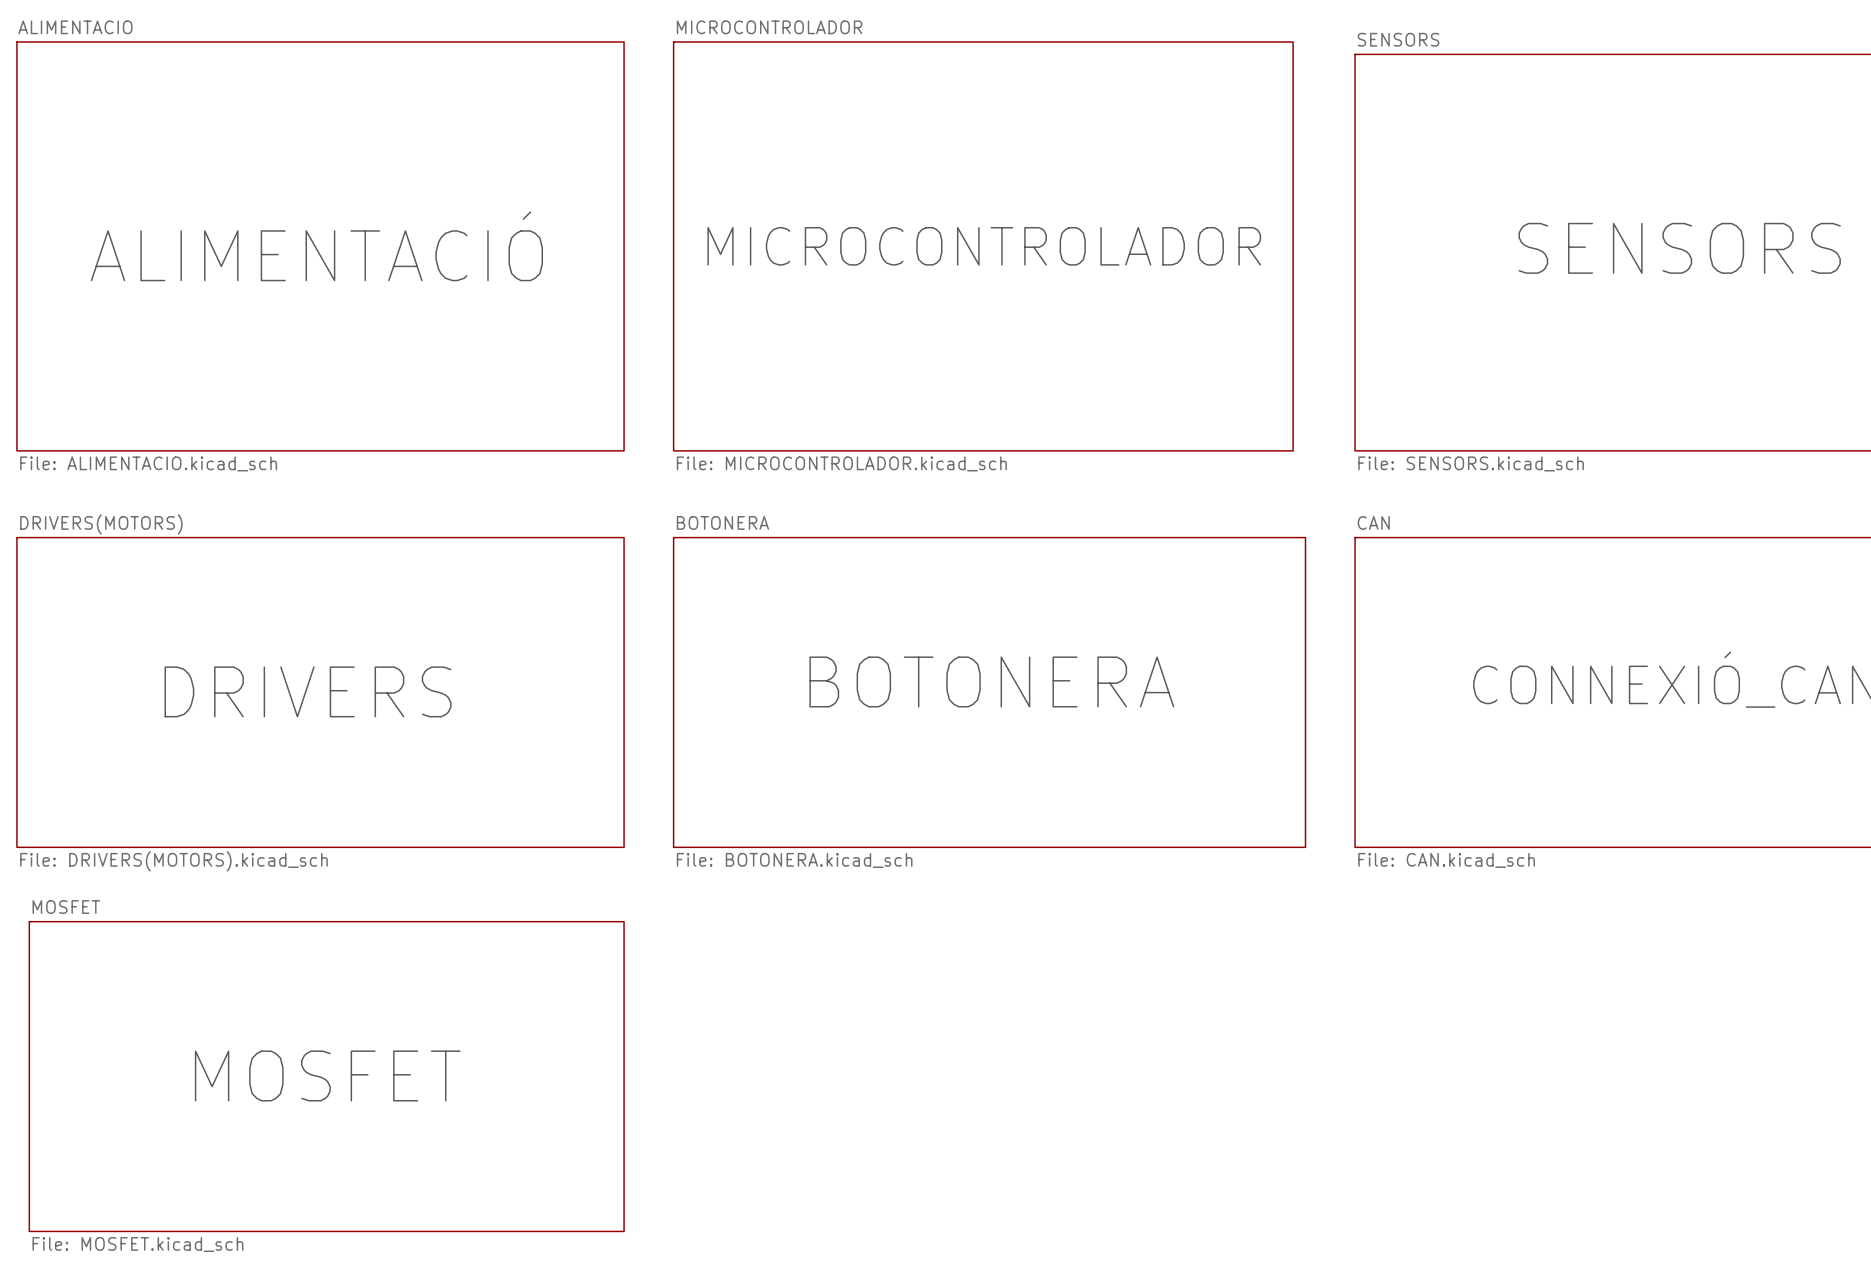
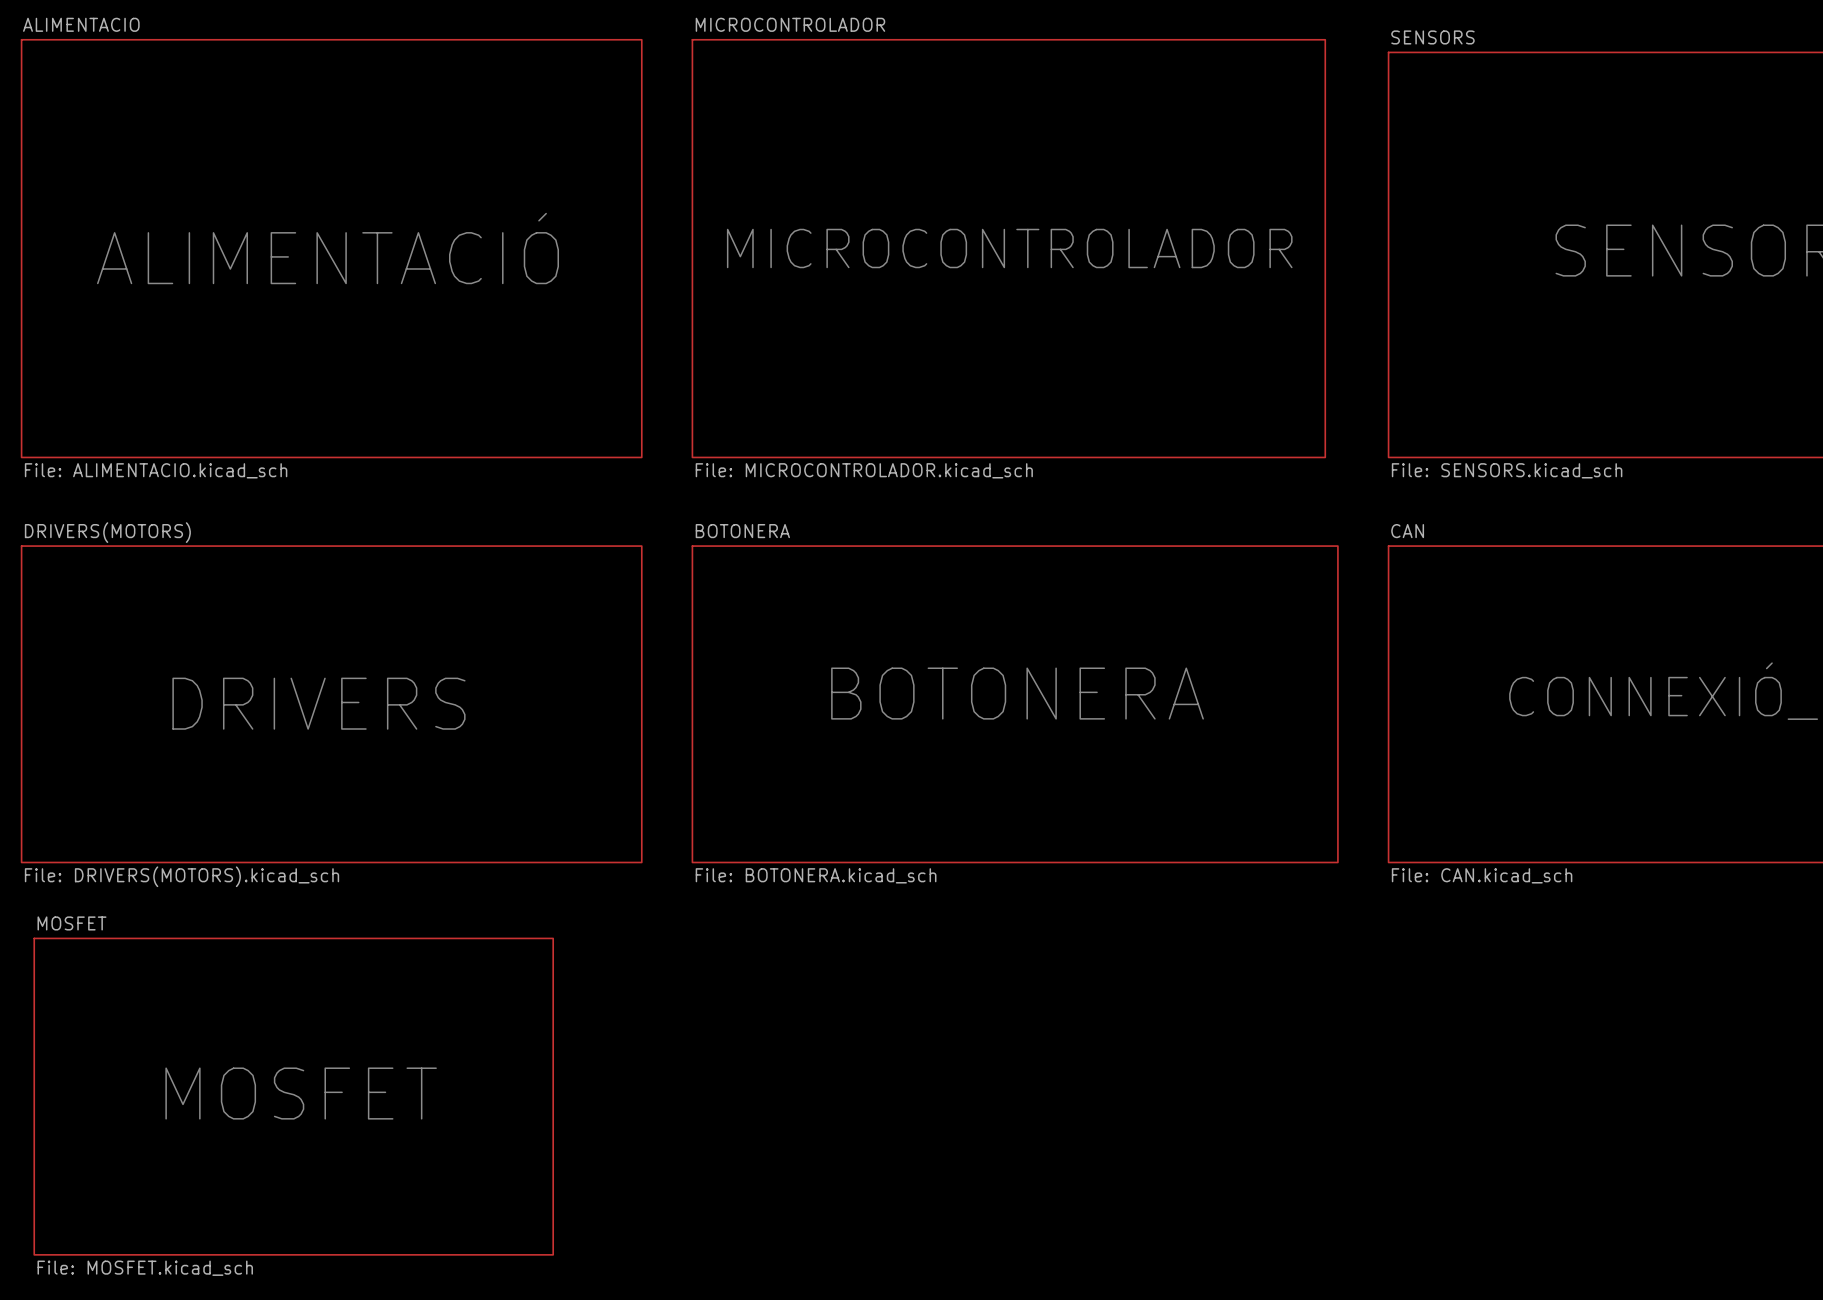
text position: MOSFET (327, 1075) -> MOSFET (301, 1093)
sheet MOSFET: none -> File: MOSFET.kicad_sch (293, 1096)
sheet MOSFET: File: MOSFET.kicad_sch (326, 1076) -> none

